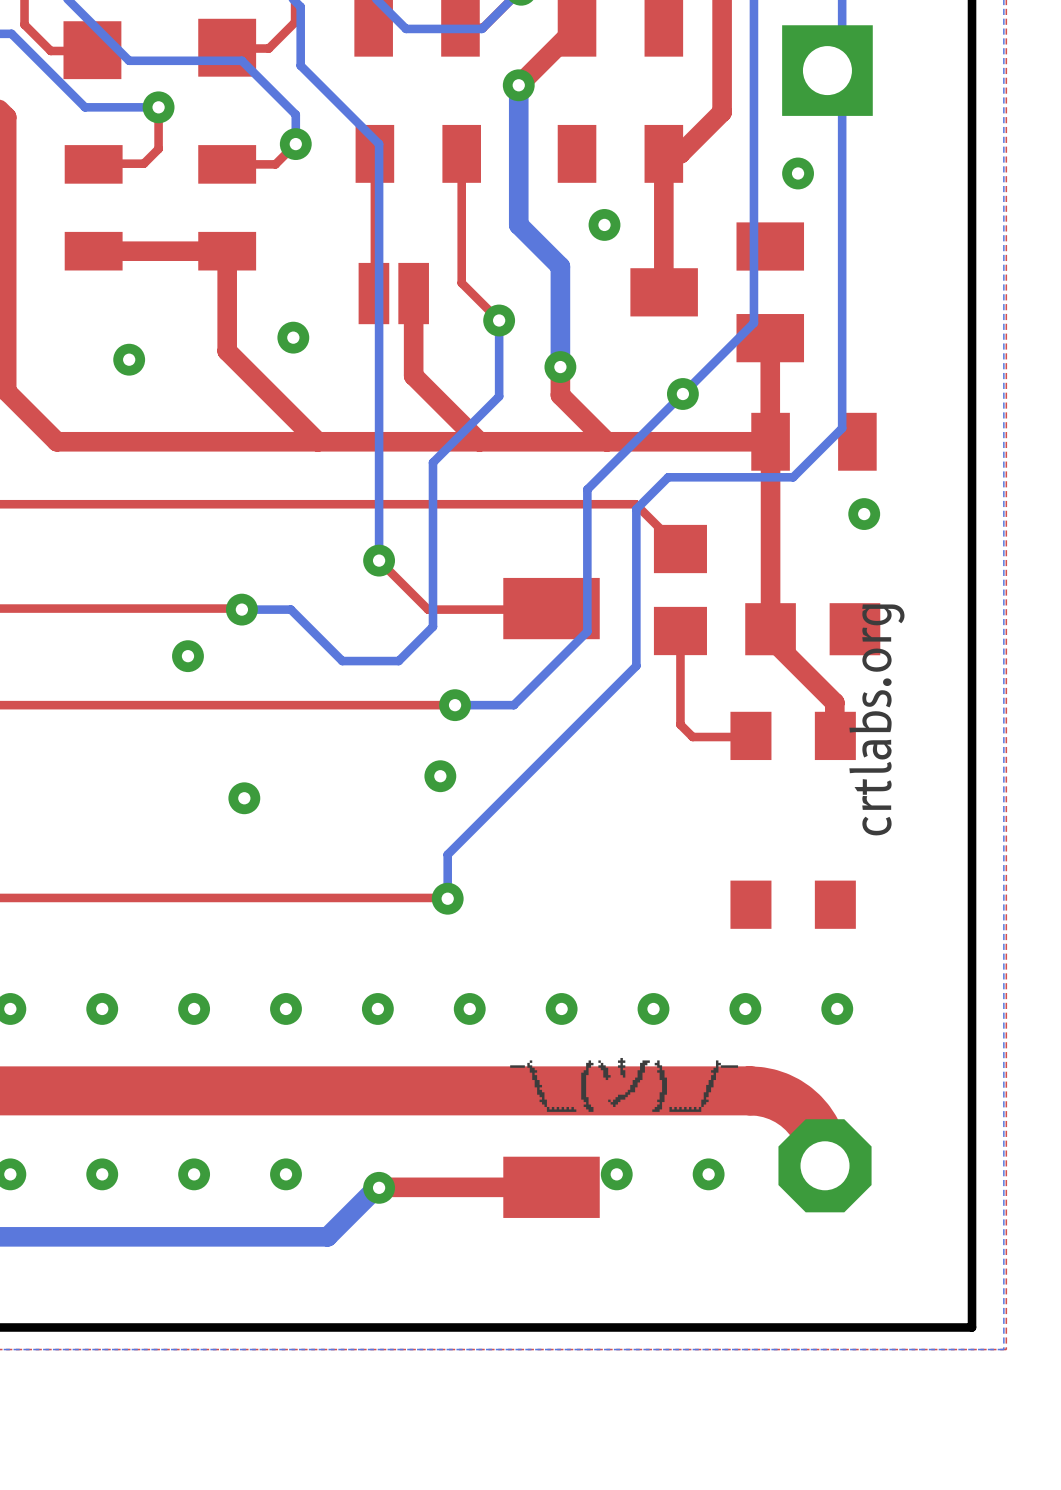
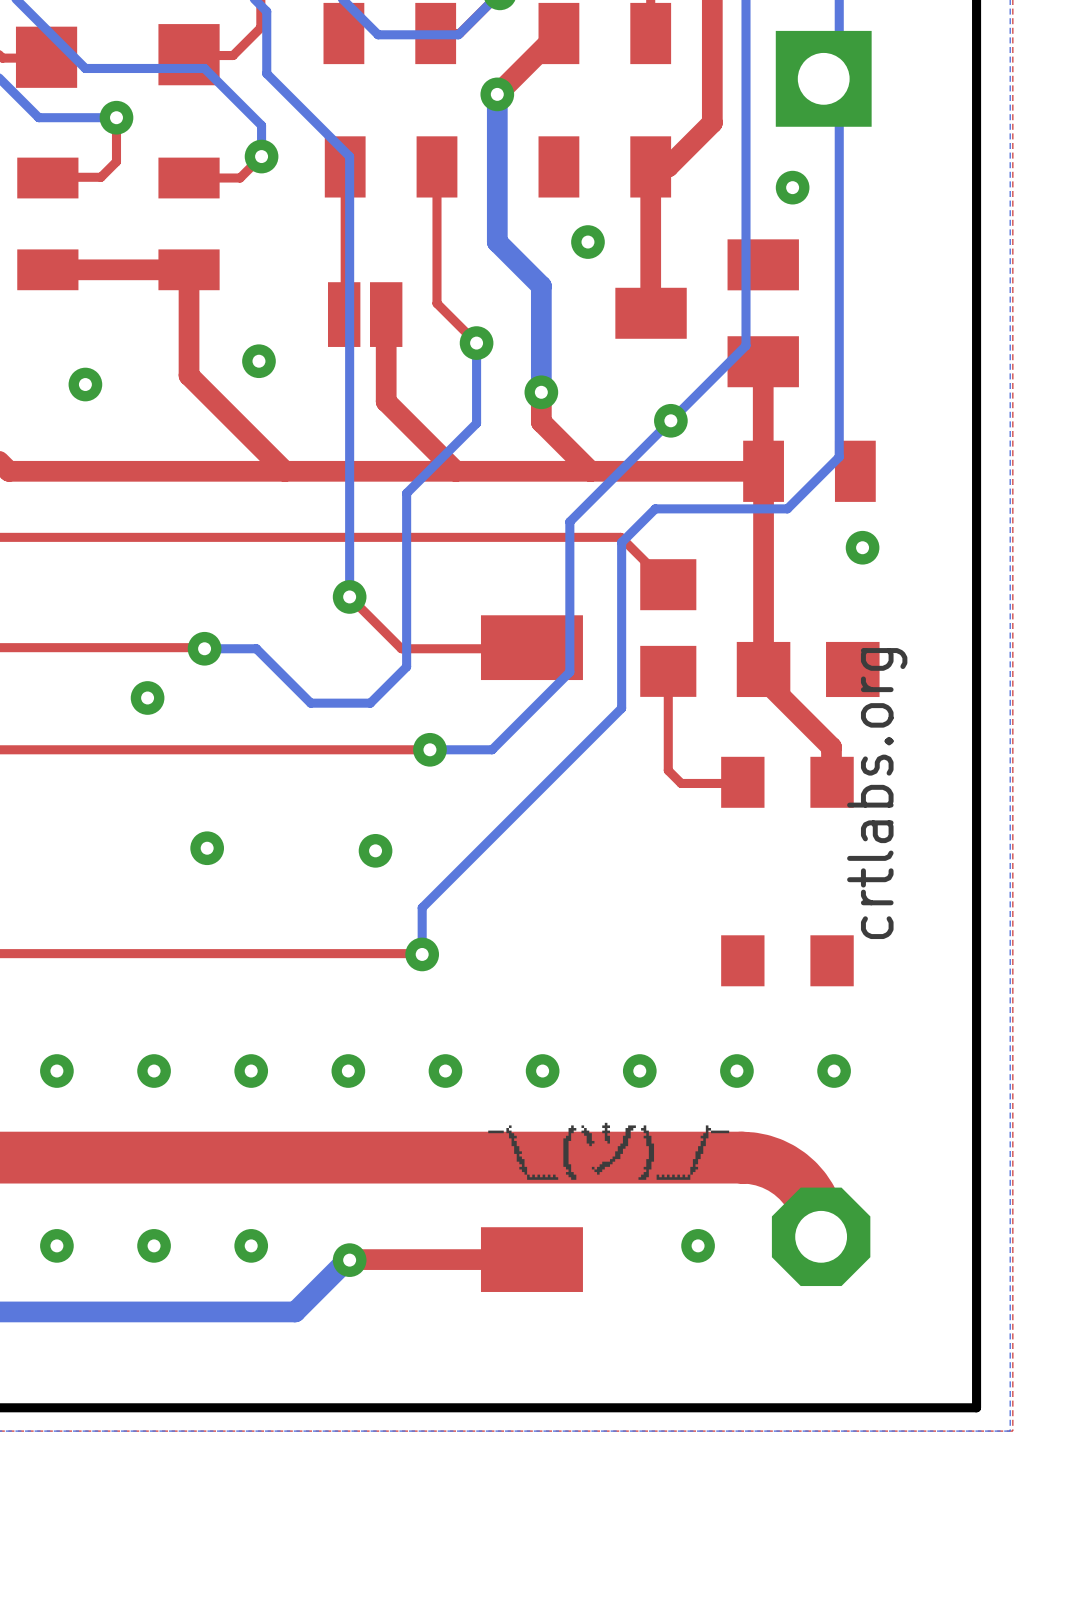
via position: (440, 776) -> (375, 850)
via: (616, 1174) -> none

